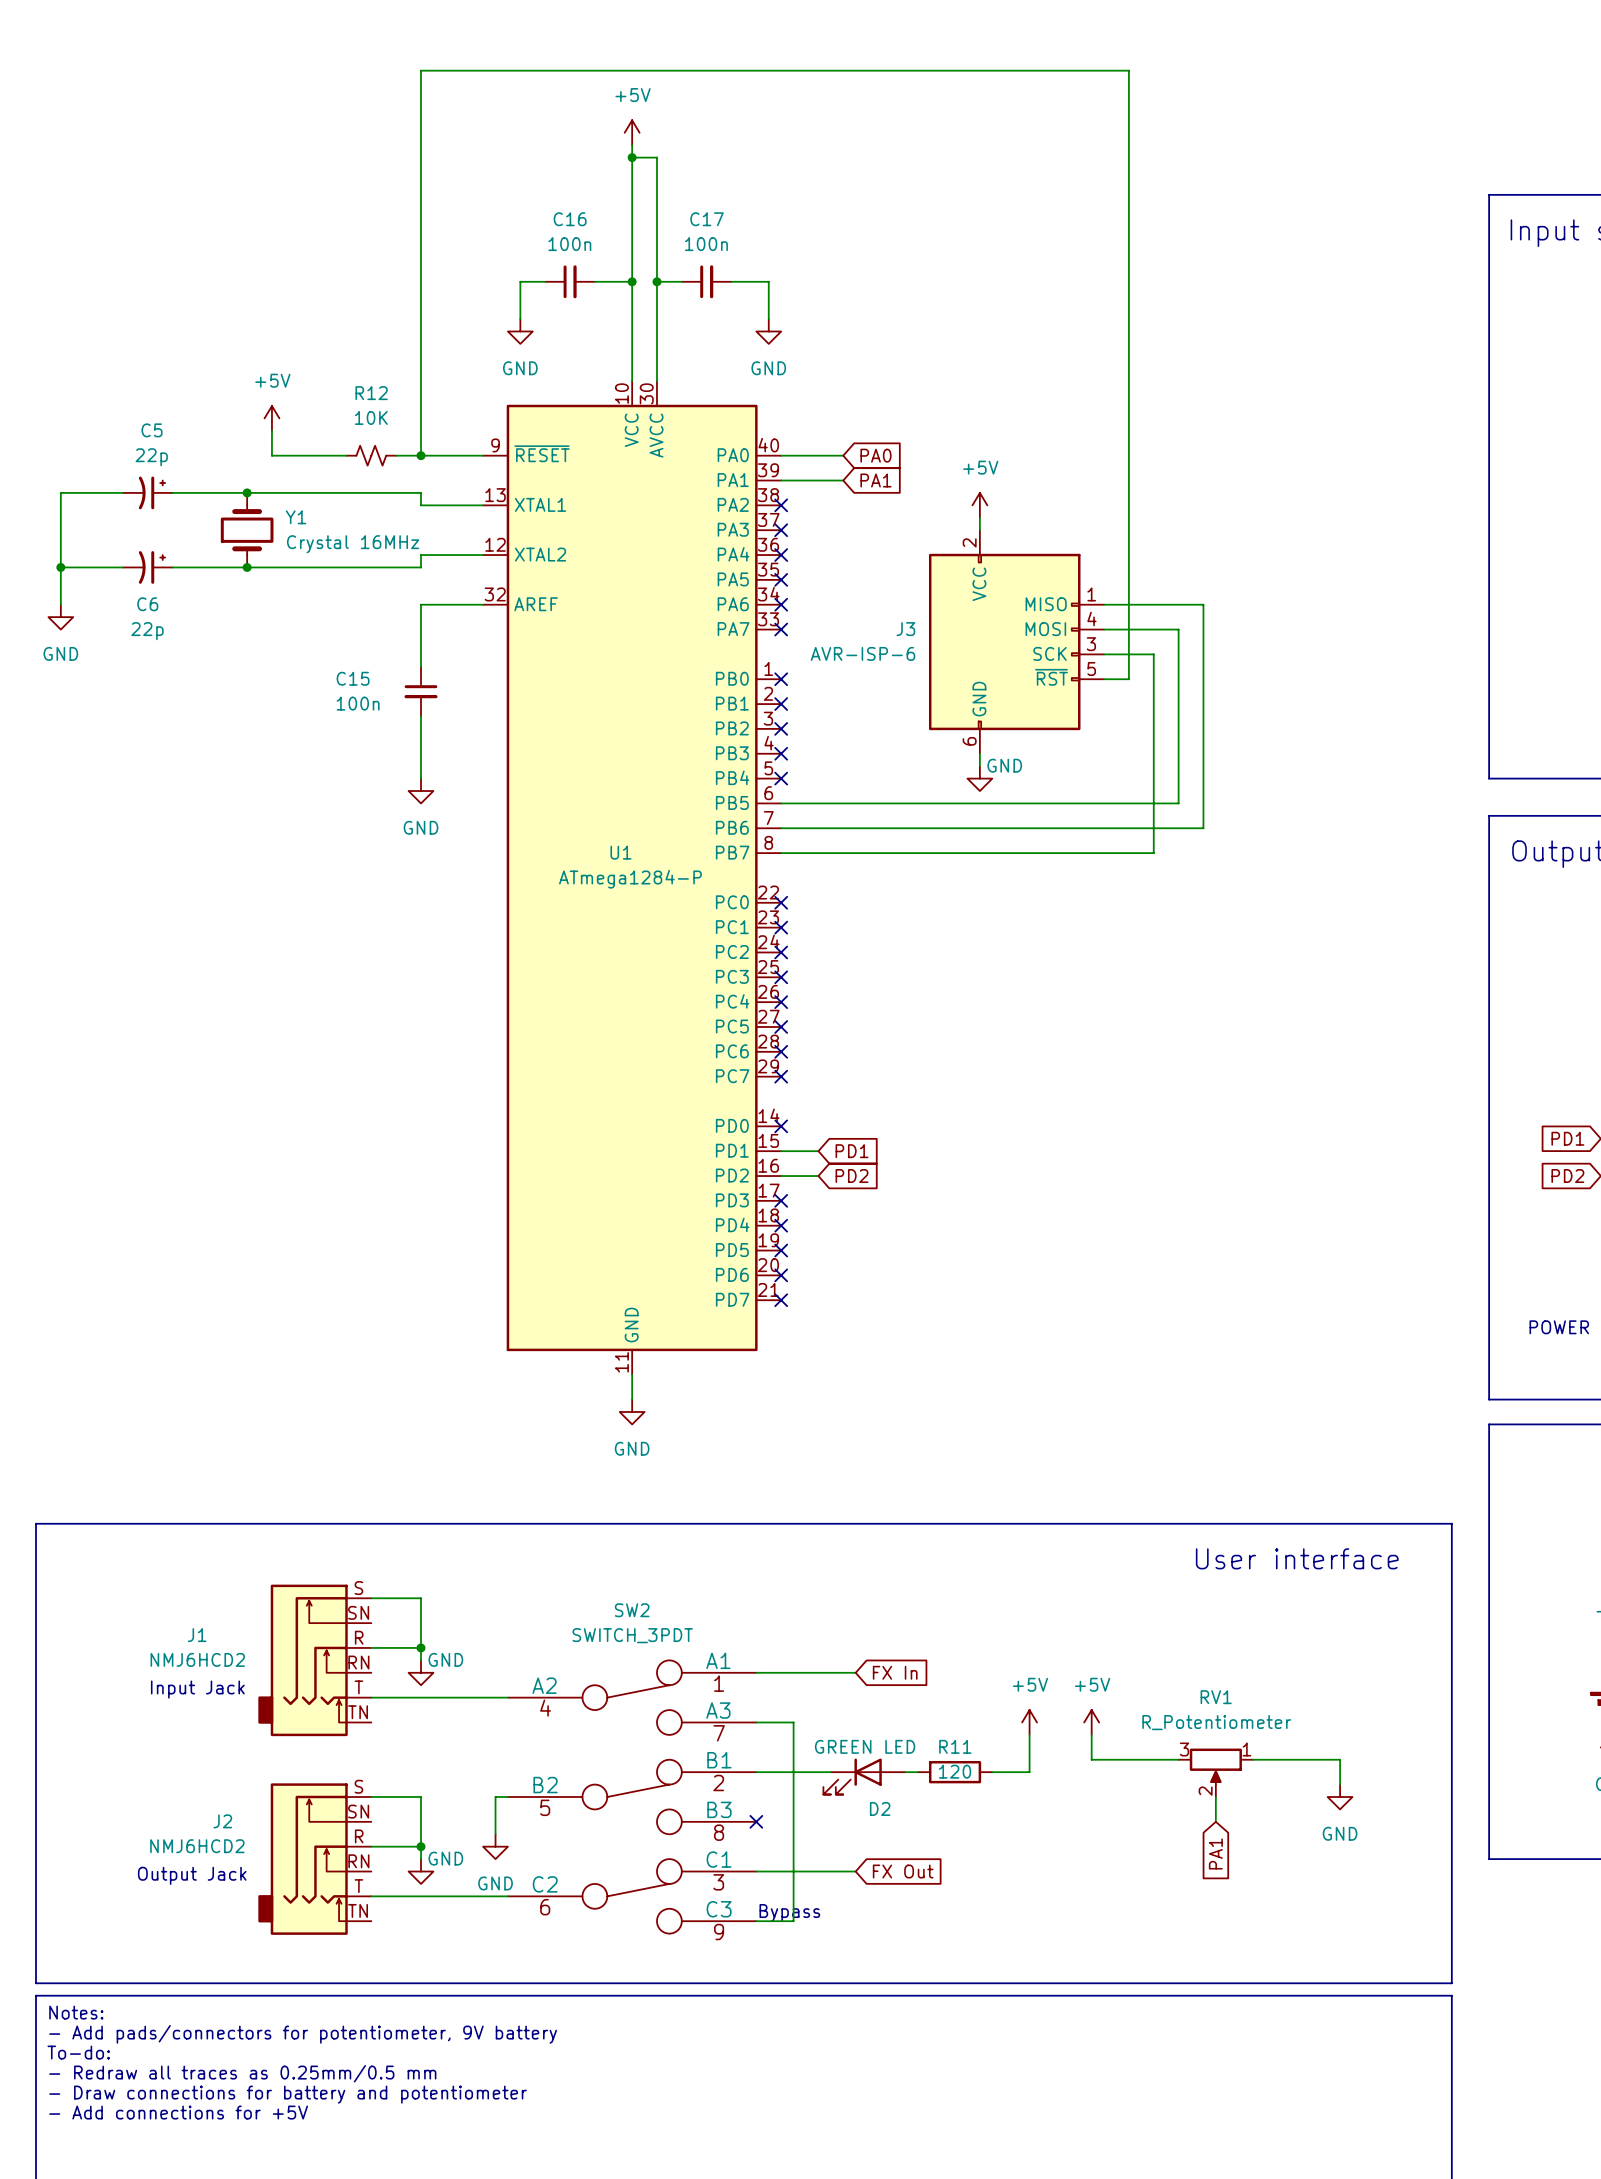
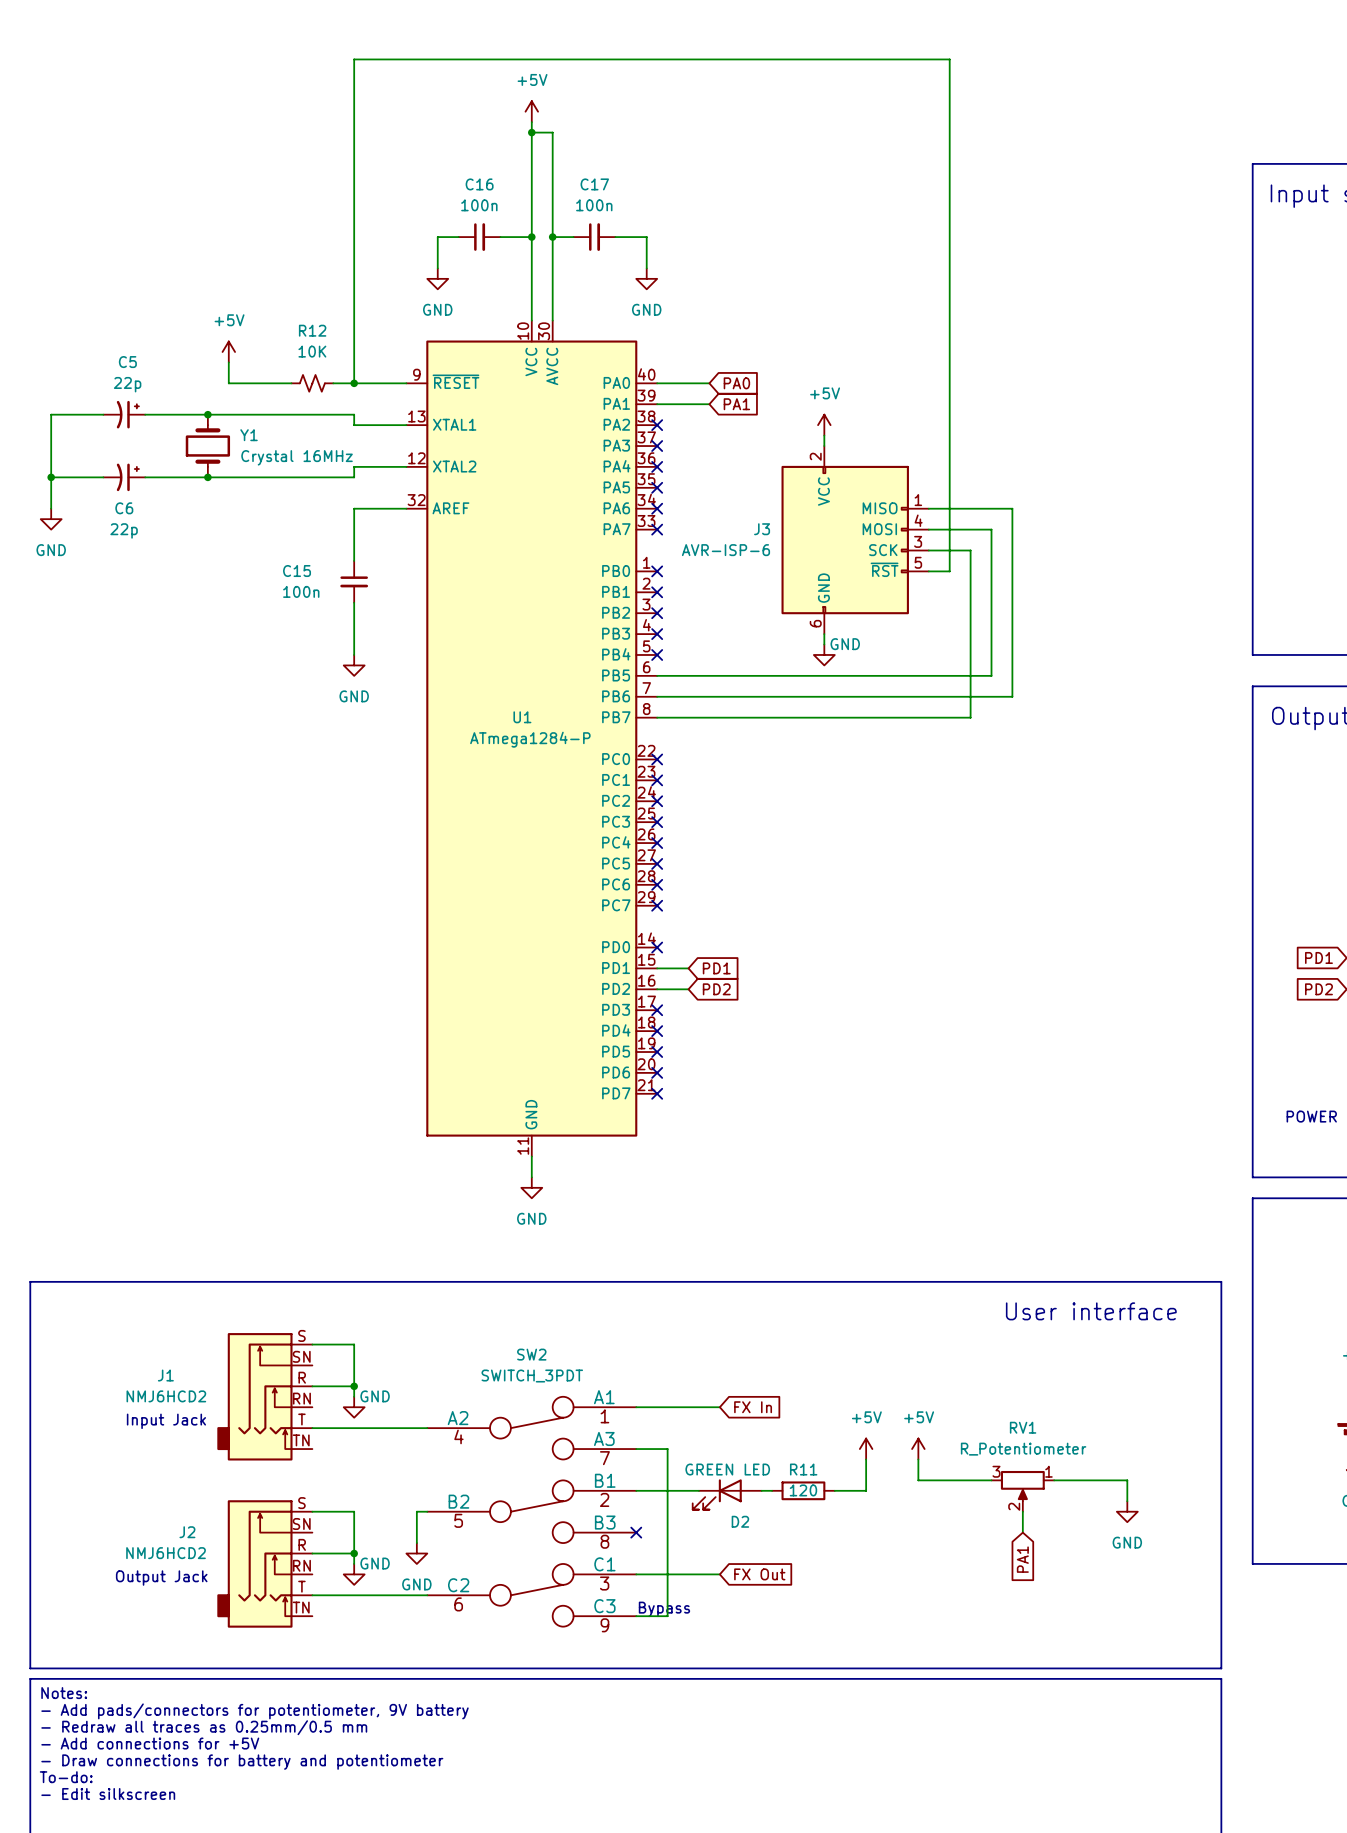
text: To-do: (78, 2052) -> - Redraw all traces as 0.25mm/0.5 mm (204, 1727)
text: - Redraw all traces as 0.25mm/0.5 mm (242, 2073) -> - Add connections for +5V (150, 1743)
text: - Add connections for +5V (178, 2112) -> To-do: (66, 1777)
text: none -> - Edit silkscreen (108, 1793)

